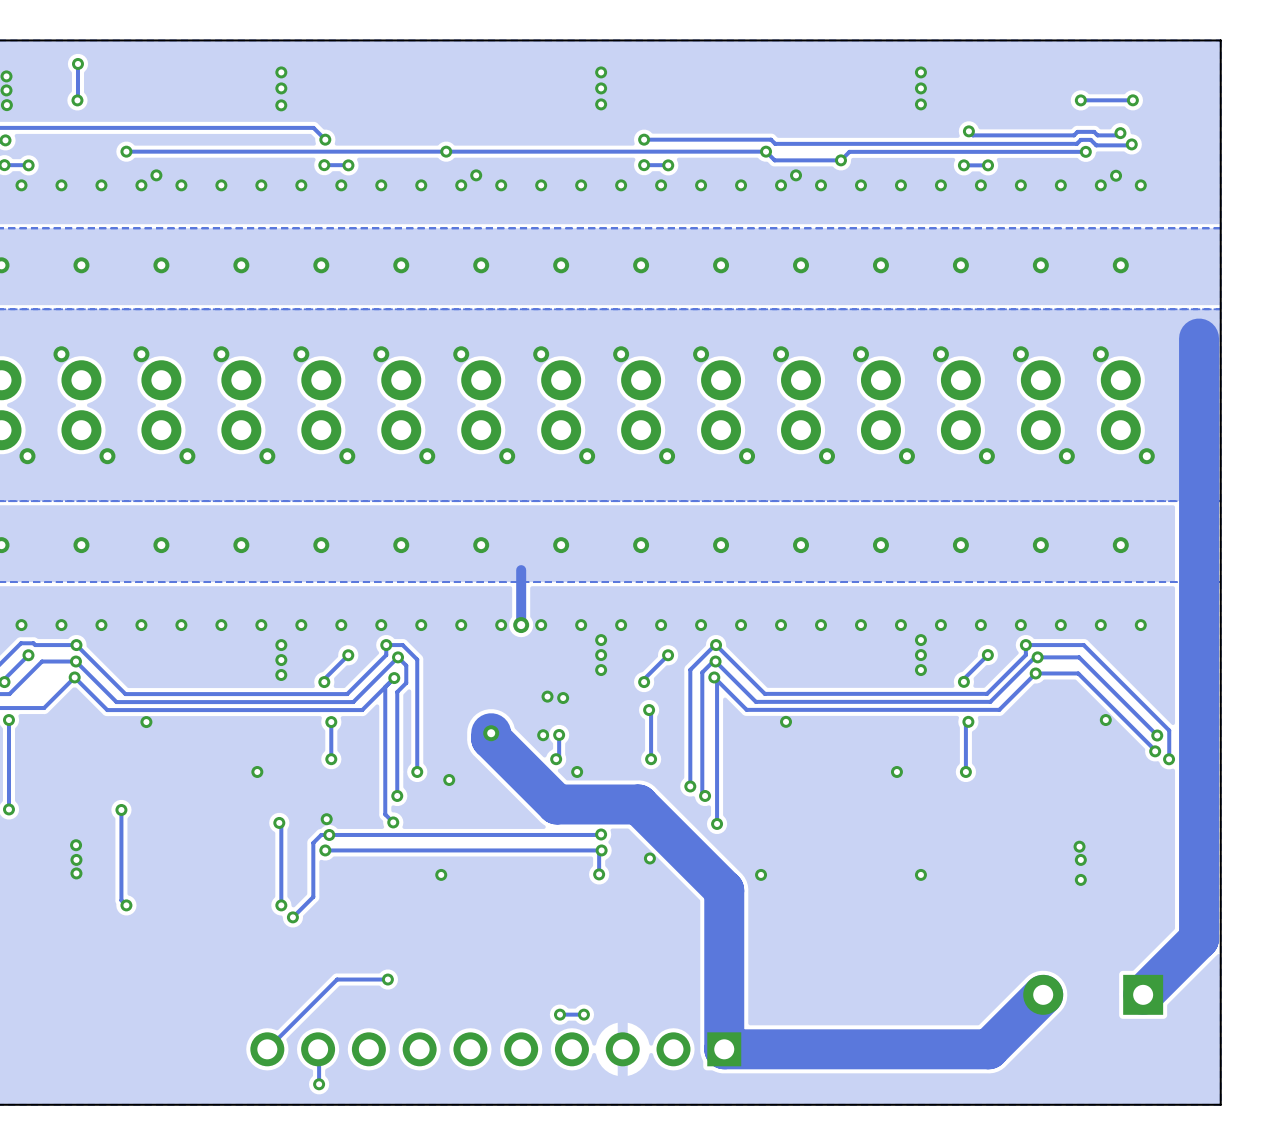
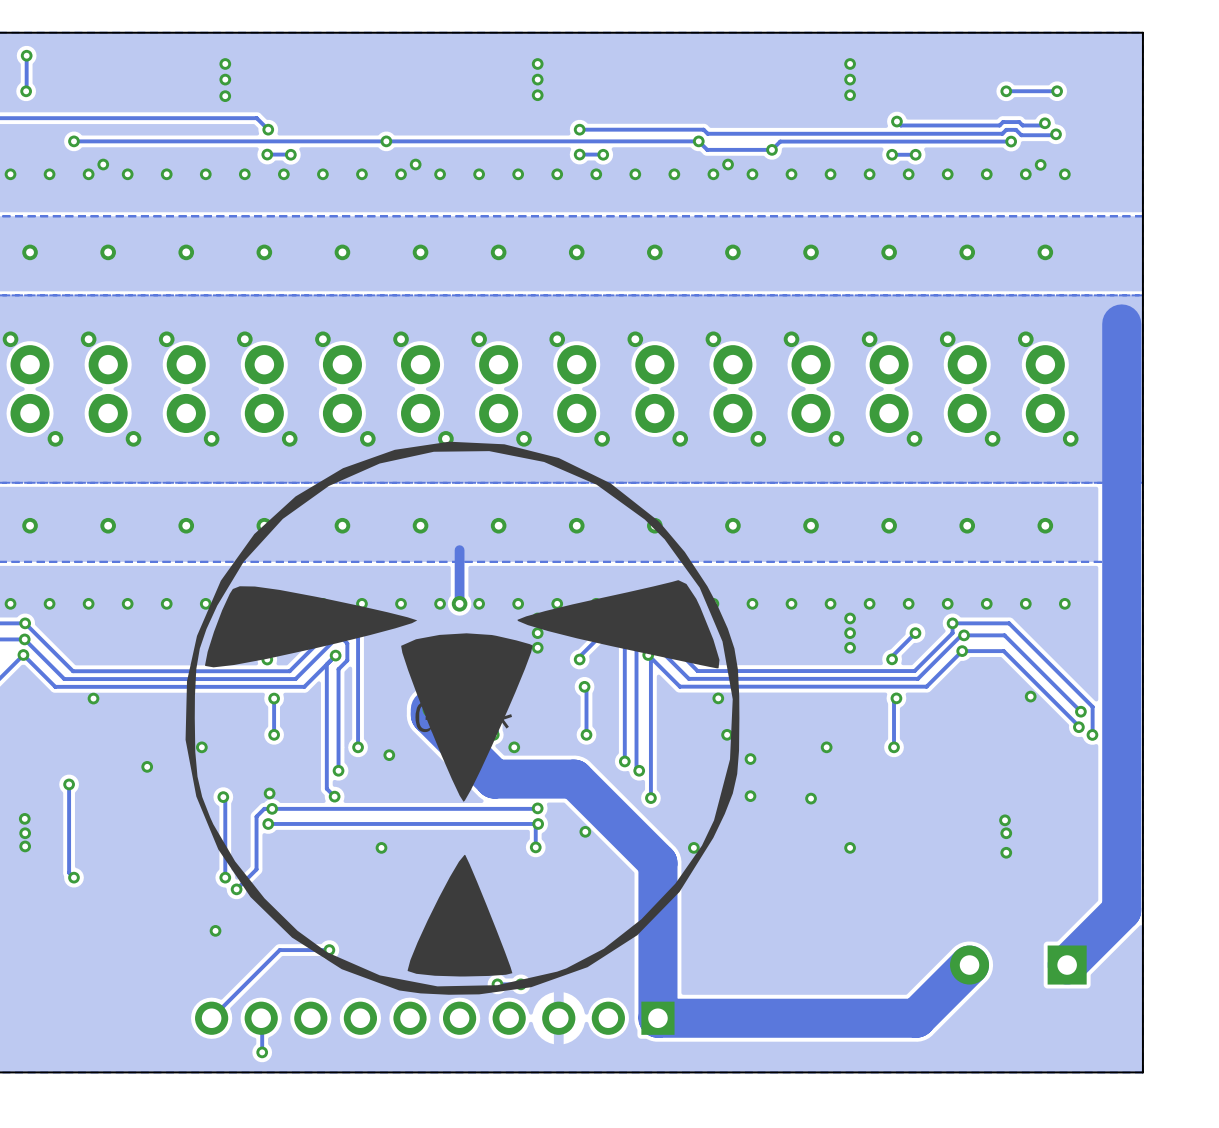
part: none -> (462, 718)
via: none -> (727, 734)
via: none -> (750, 759)
via: none -> (147, 766)
via: none -> (750, 796)
via: none -> (811, 798)
via: none -> (215, 930)

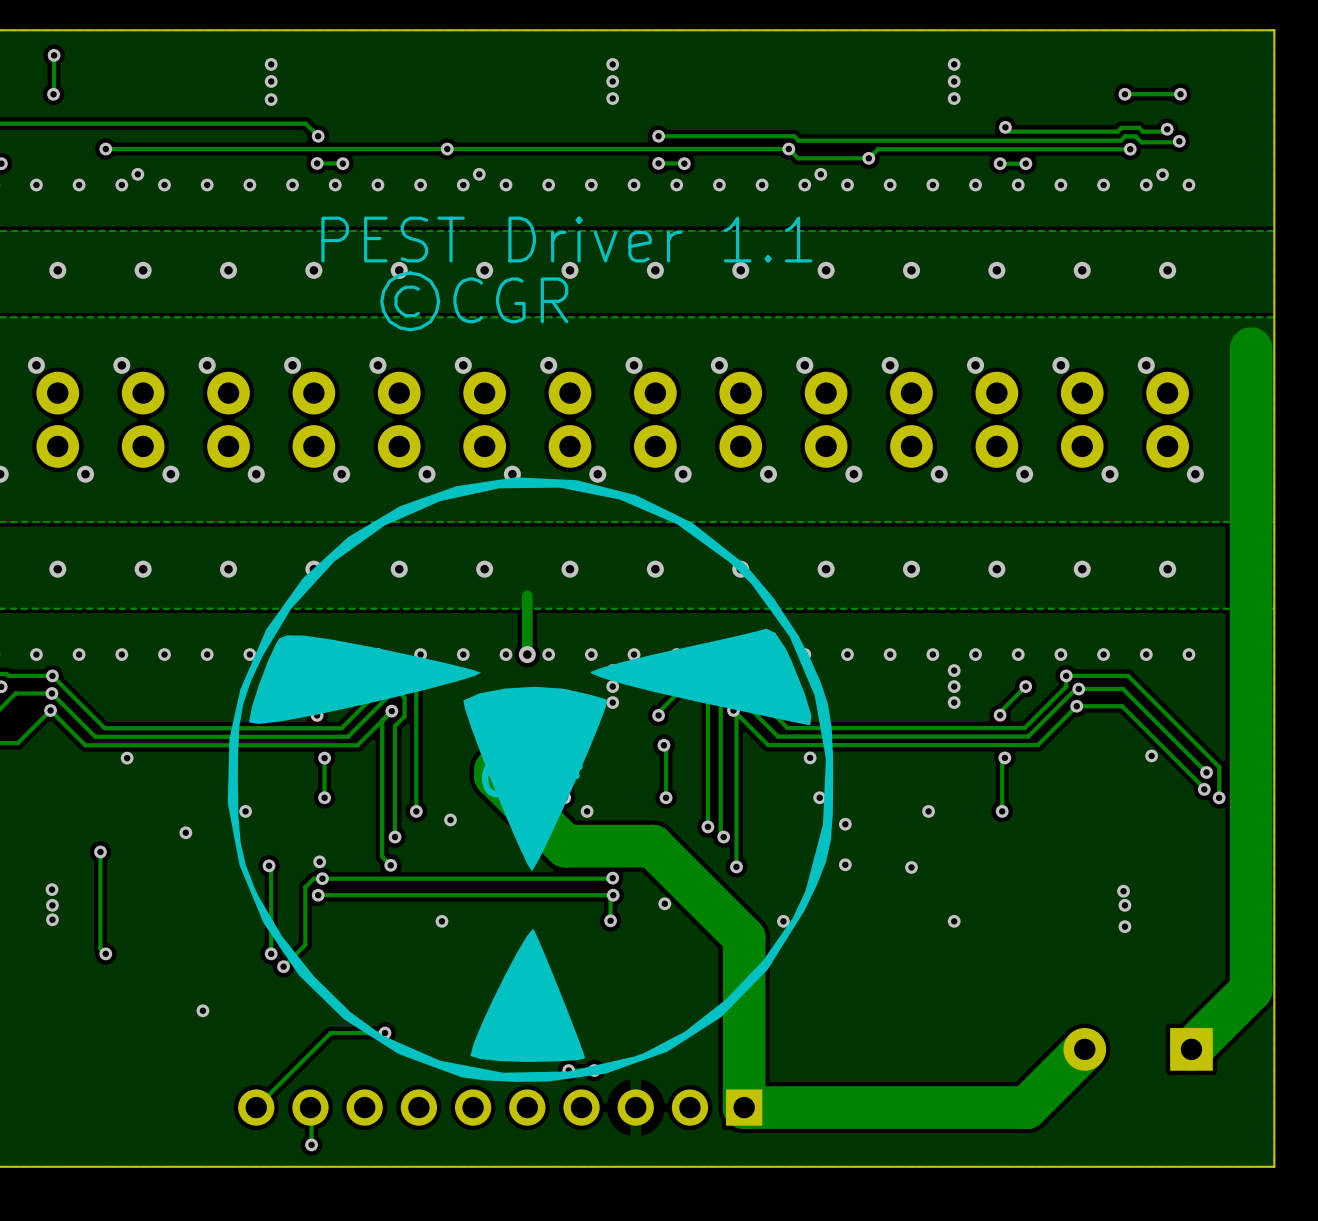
text: none -> PEST Driver 1.1 (566, 239)
text: none -> ©CGR (474, 301)
via position: (215, 930) -> (202, 1010)

